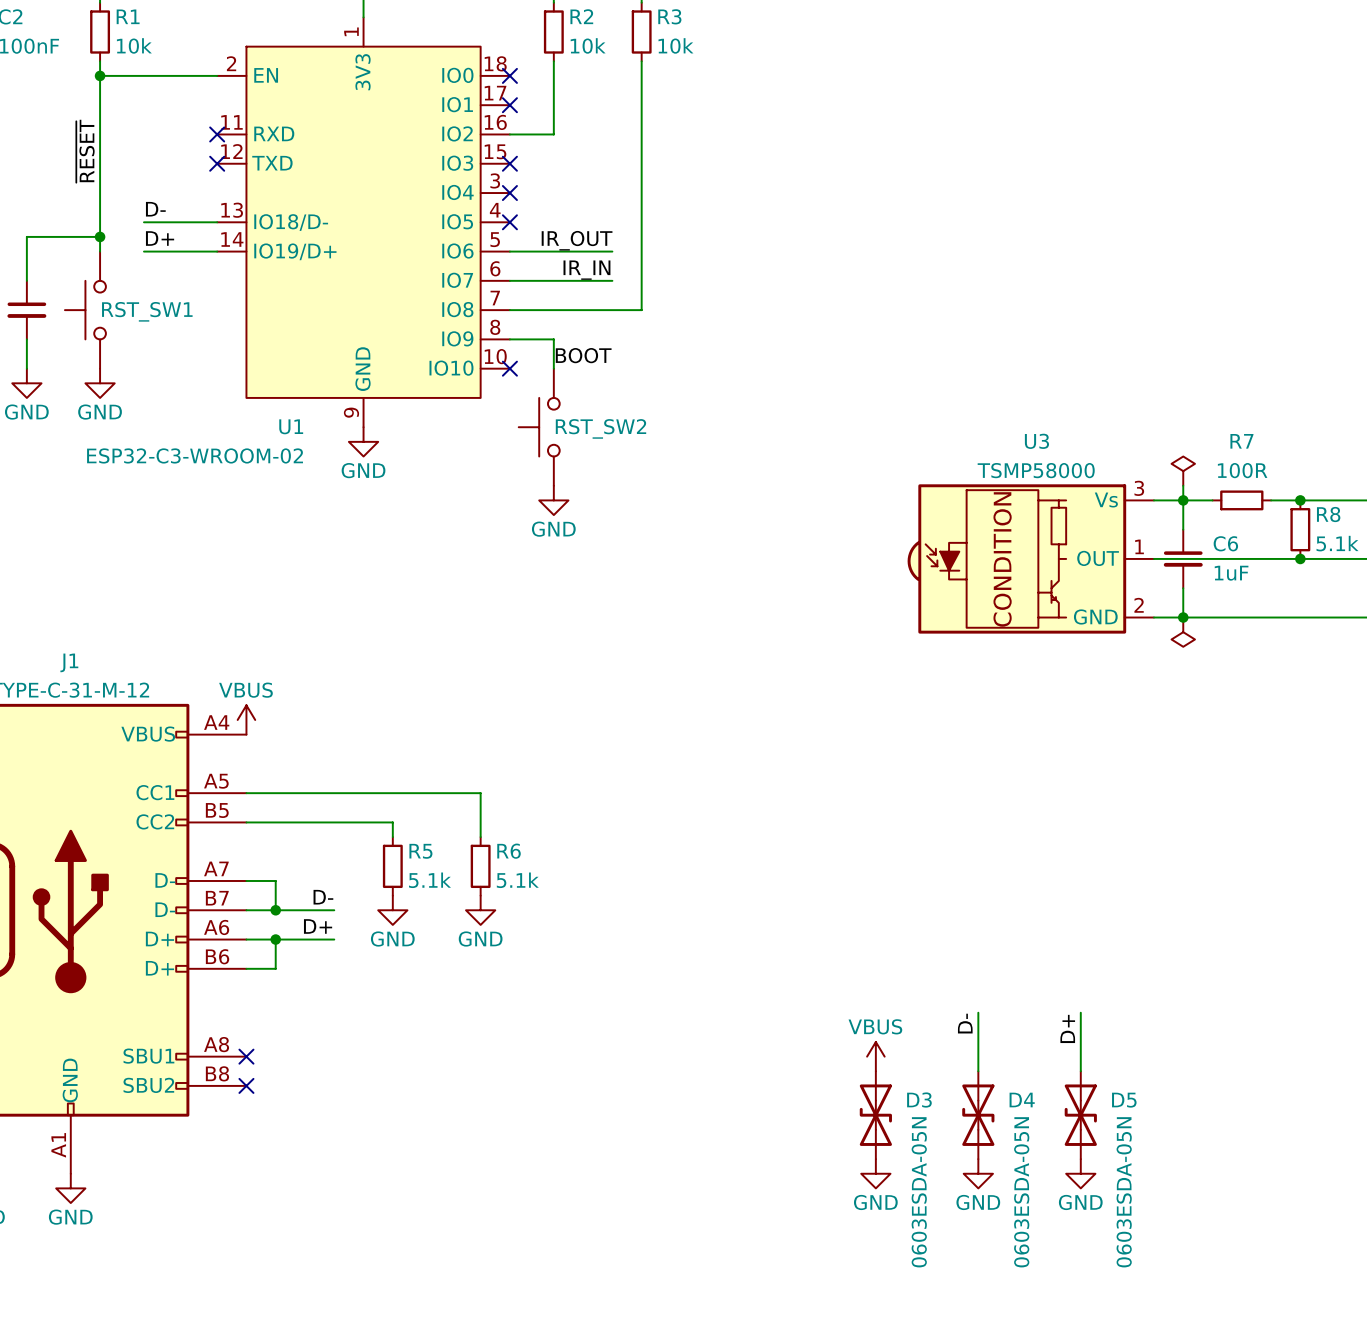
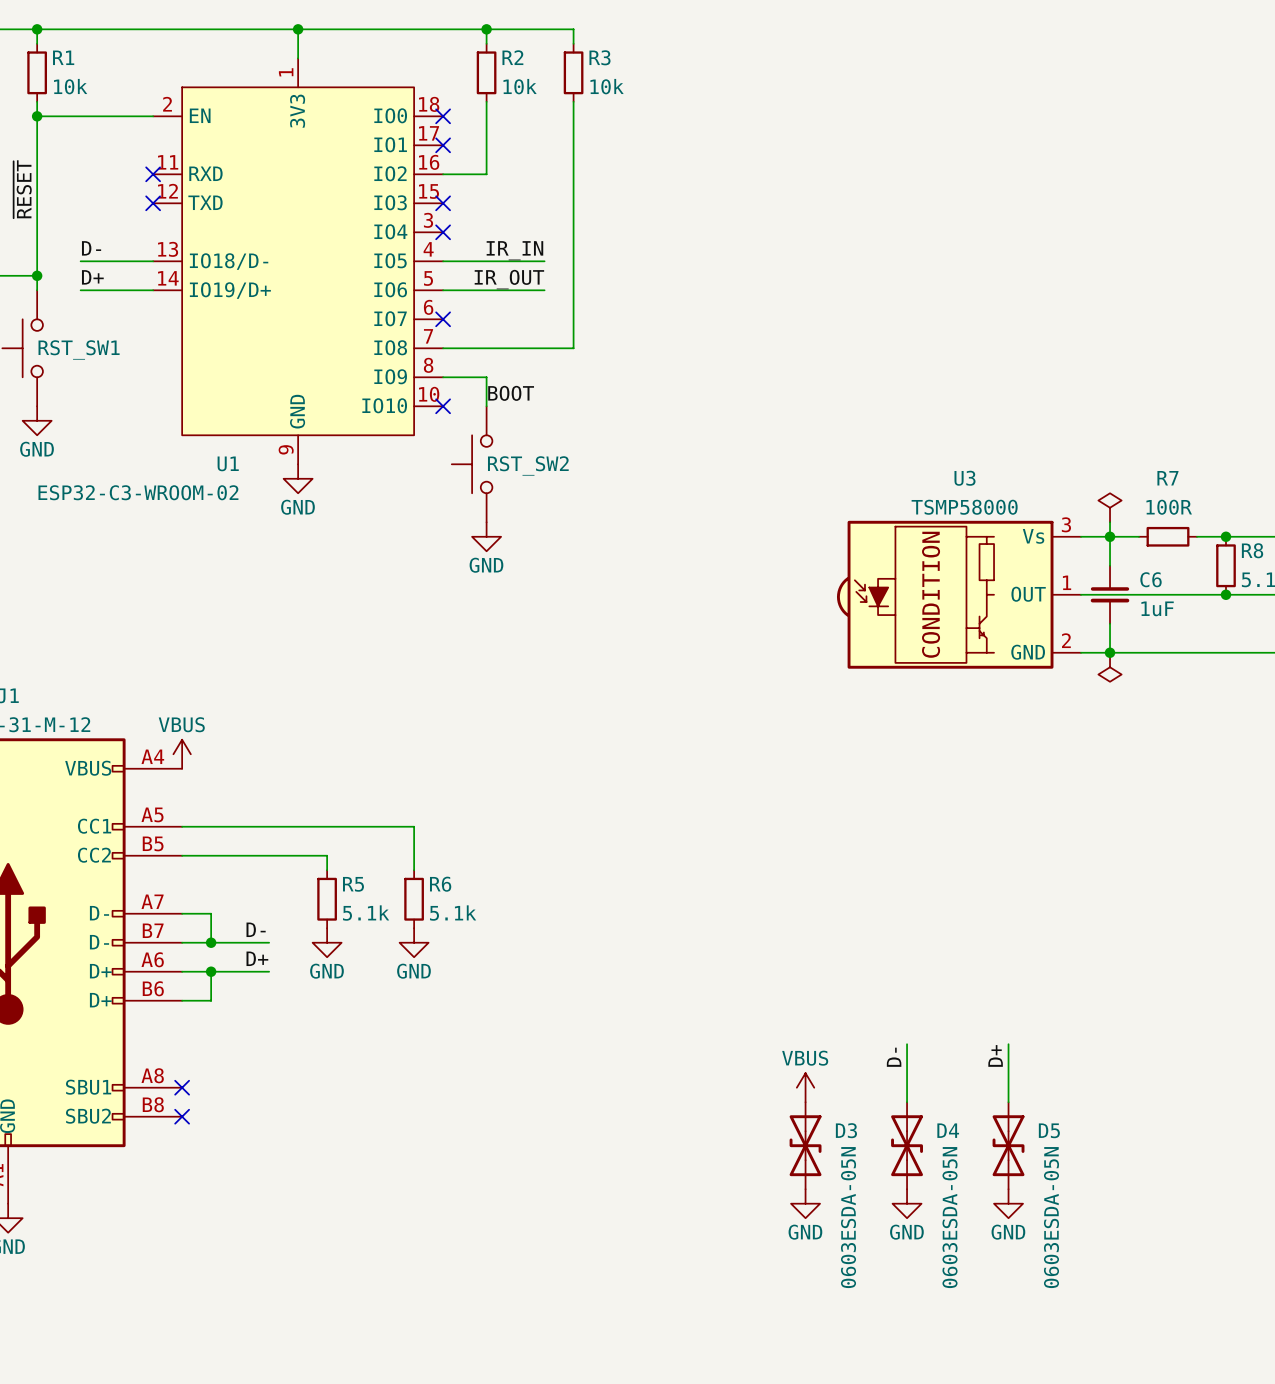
no-connect mark position: (509, 222) -> (443, 319)
label position: IR_IN (586, 270) -> IR_IN (514, 250)
wire: (509, 280) (612, 280) -> (443, 261) (544, 261)

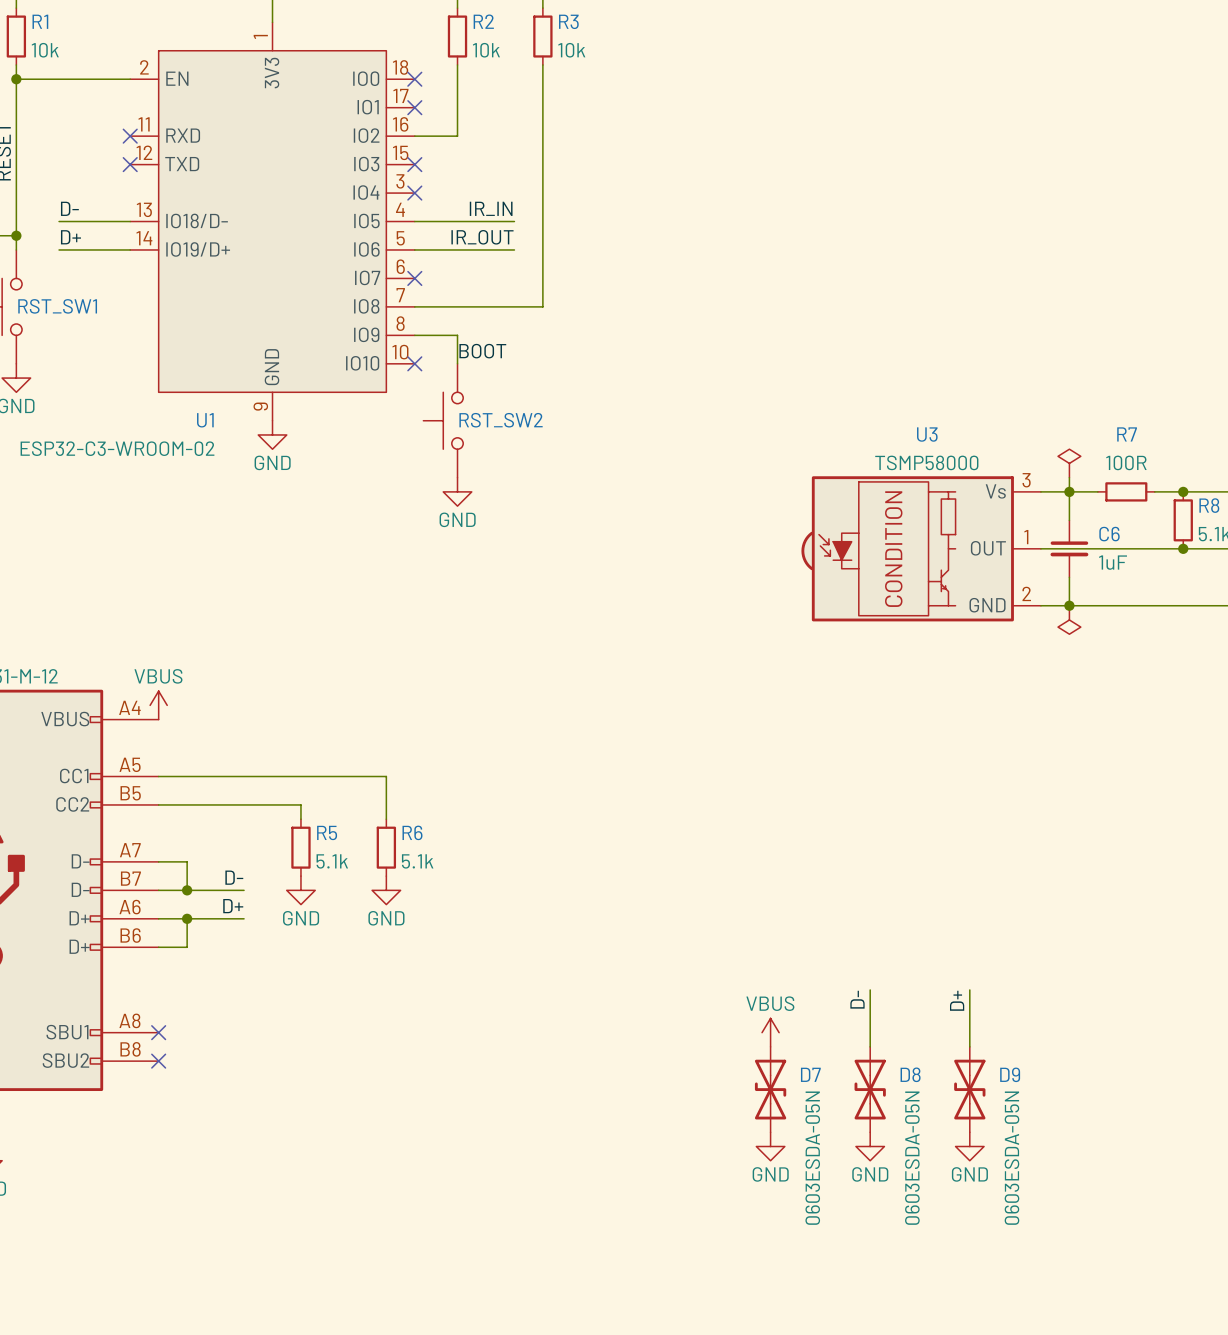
D3 name: D3 (846, 1130) -> D7 (810, 1074)
D4 name: D4 (948, 1130) -> D8 (910, 1074)
D5 name: D5 (1049, 1130) -> D9 (1010, 1074)

